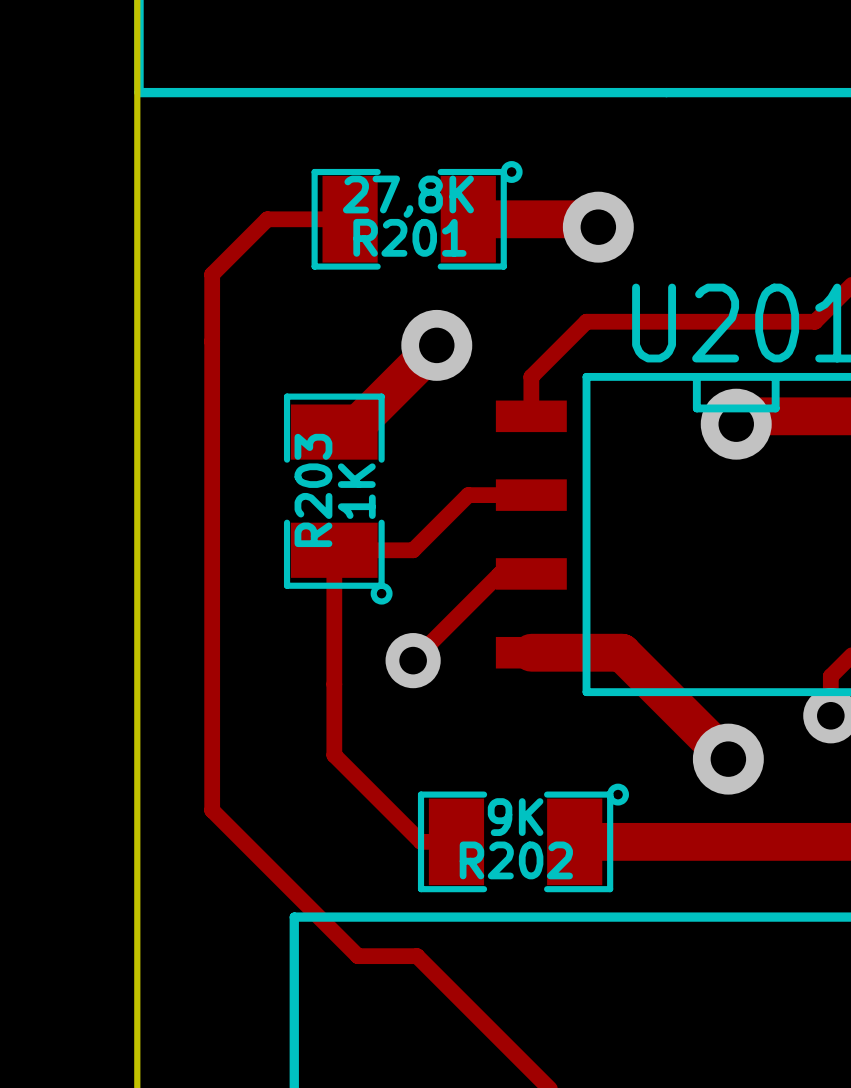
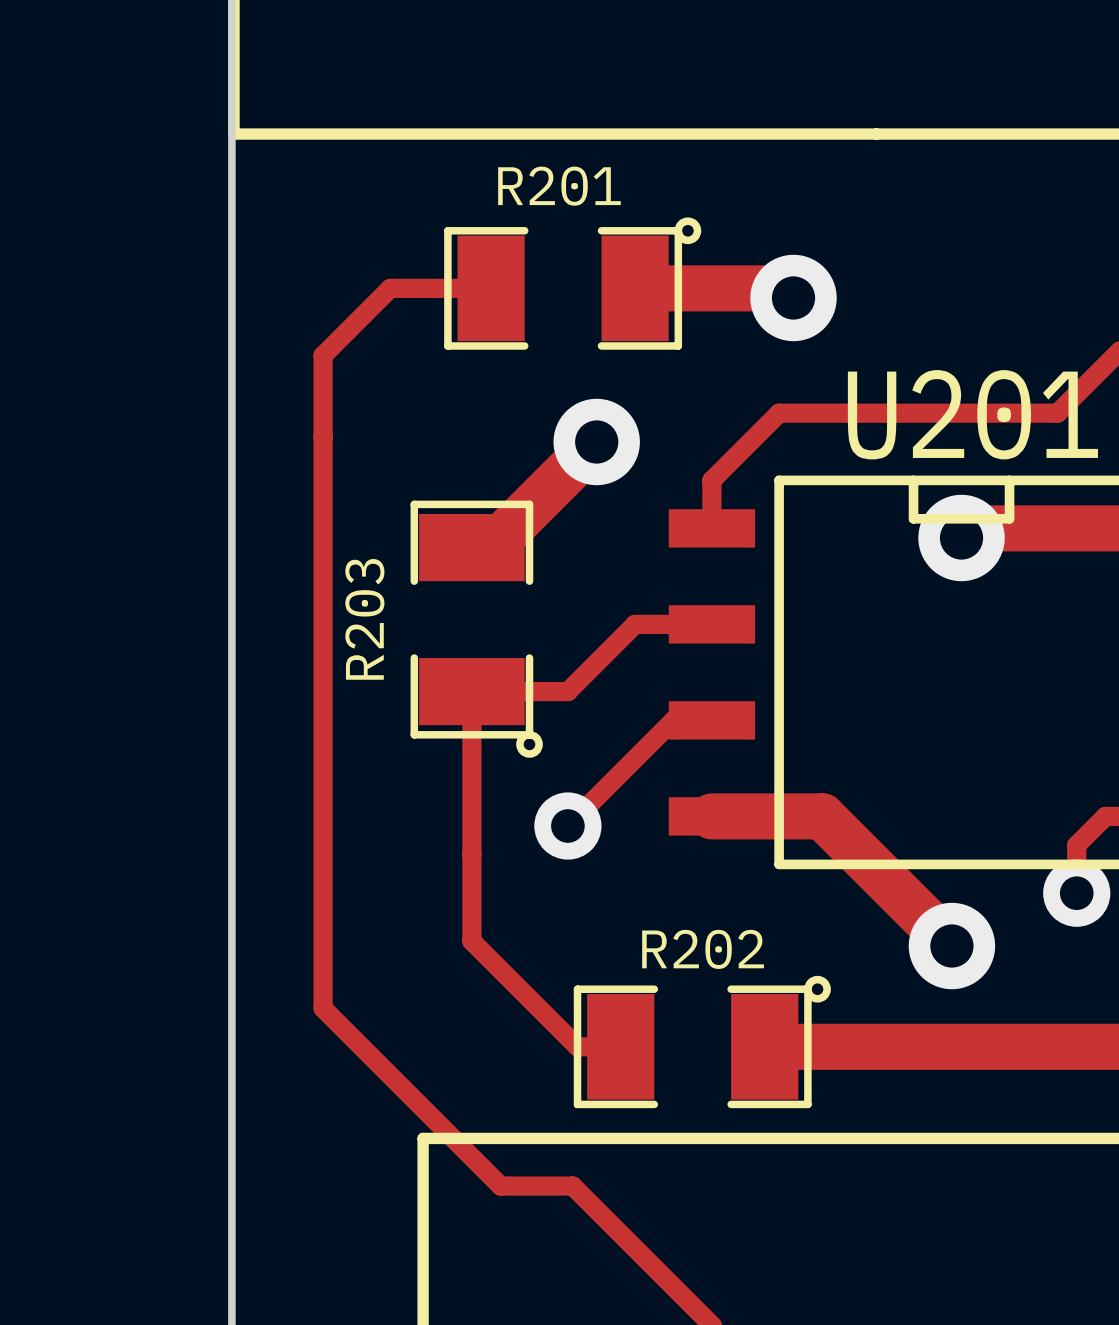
R201 value: 27,8K (408, 196) -> none
R201 name position: R201 (409, 237) -> R201 (559, 186)
R203 name position: R203 (313, 490) -> R203 (364, 619)
R203 value: 1K (356, 491) -> none
R202 value: 9K (515, 817) -> none
R202 name position: R202 (516, 860) -> R202 (703, 949)

